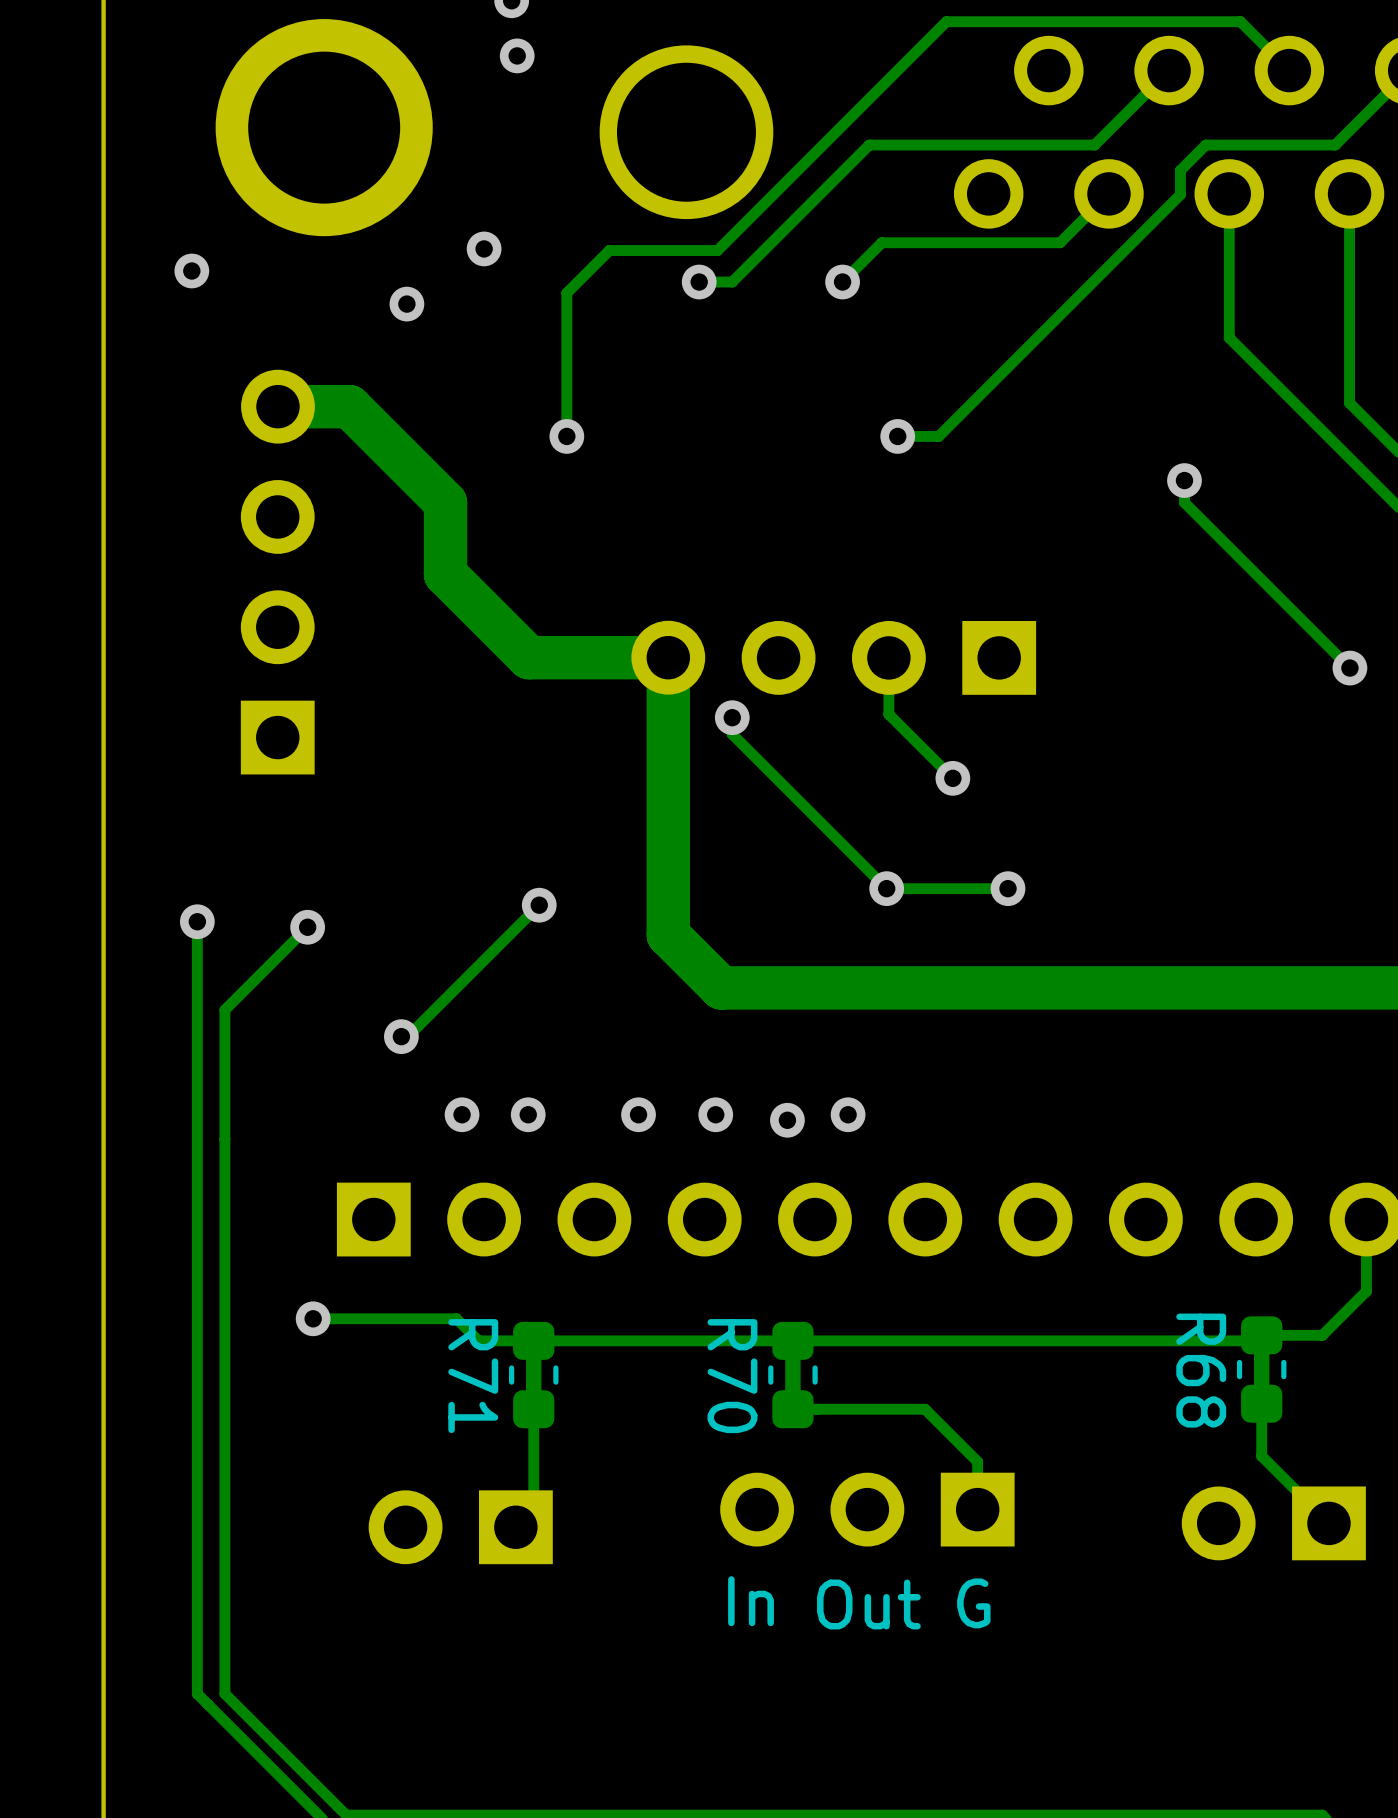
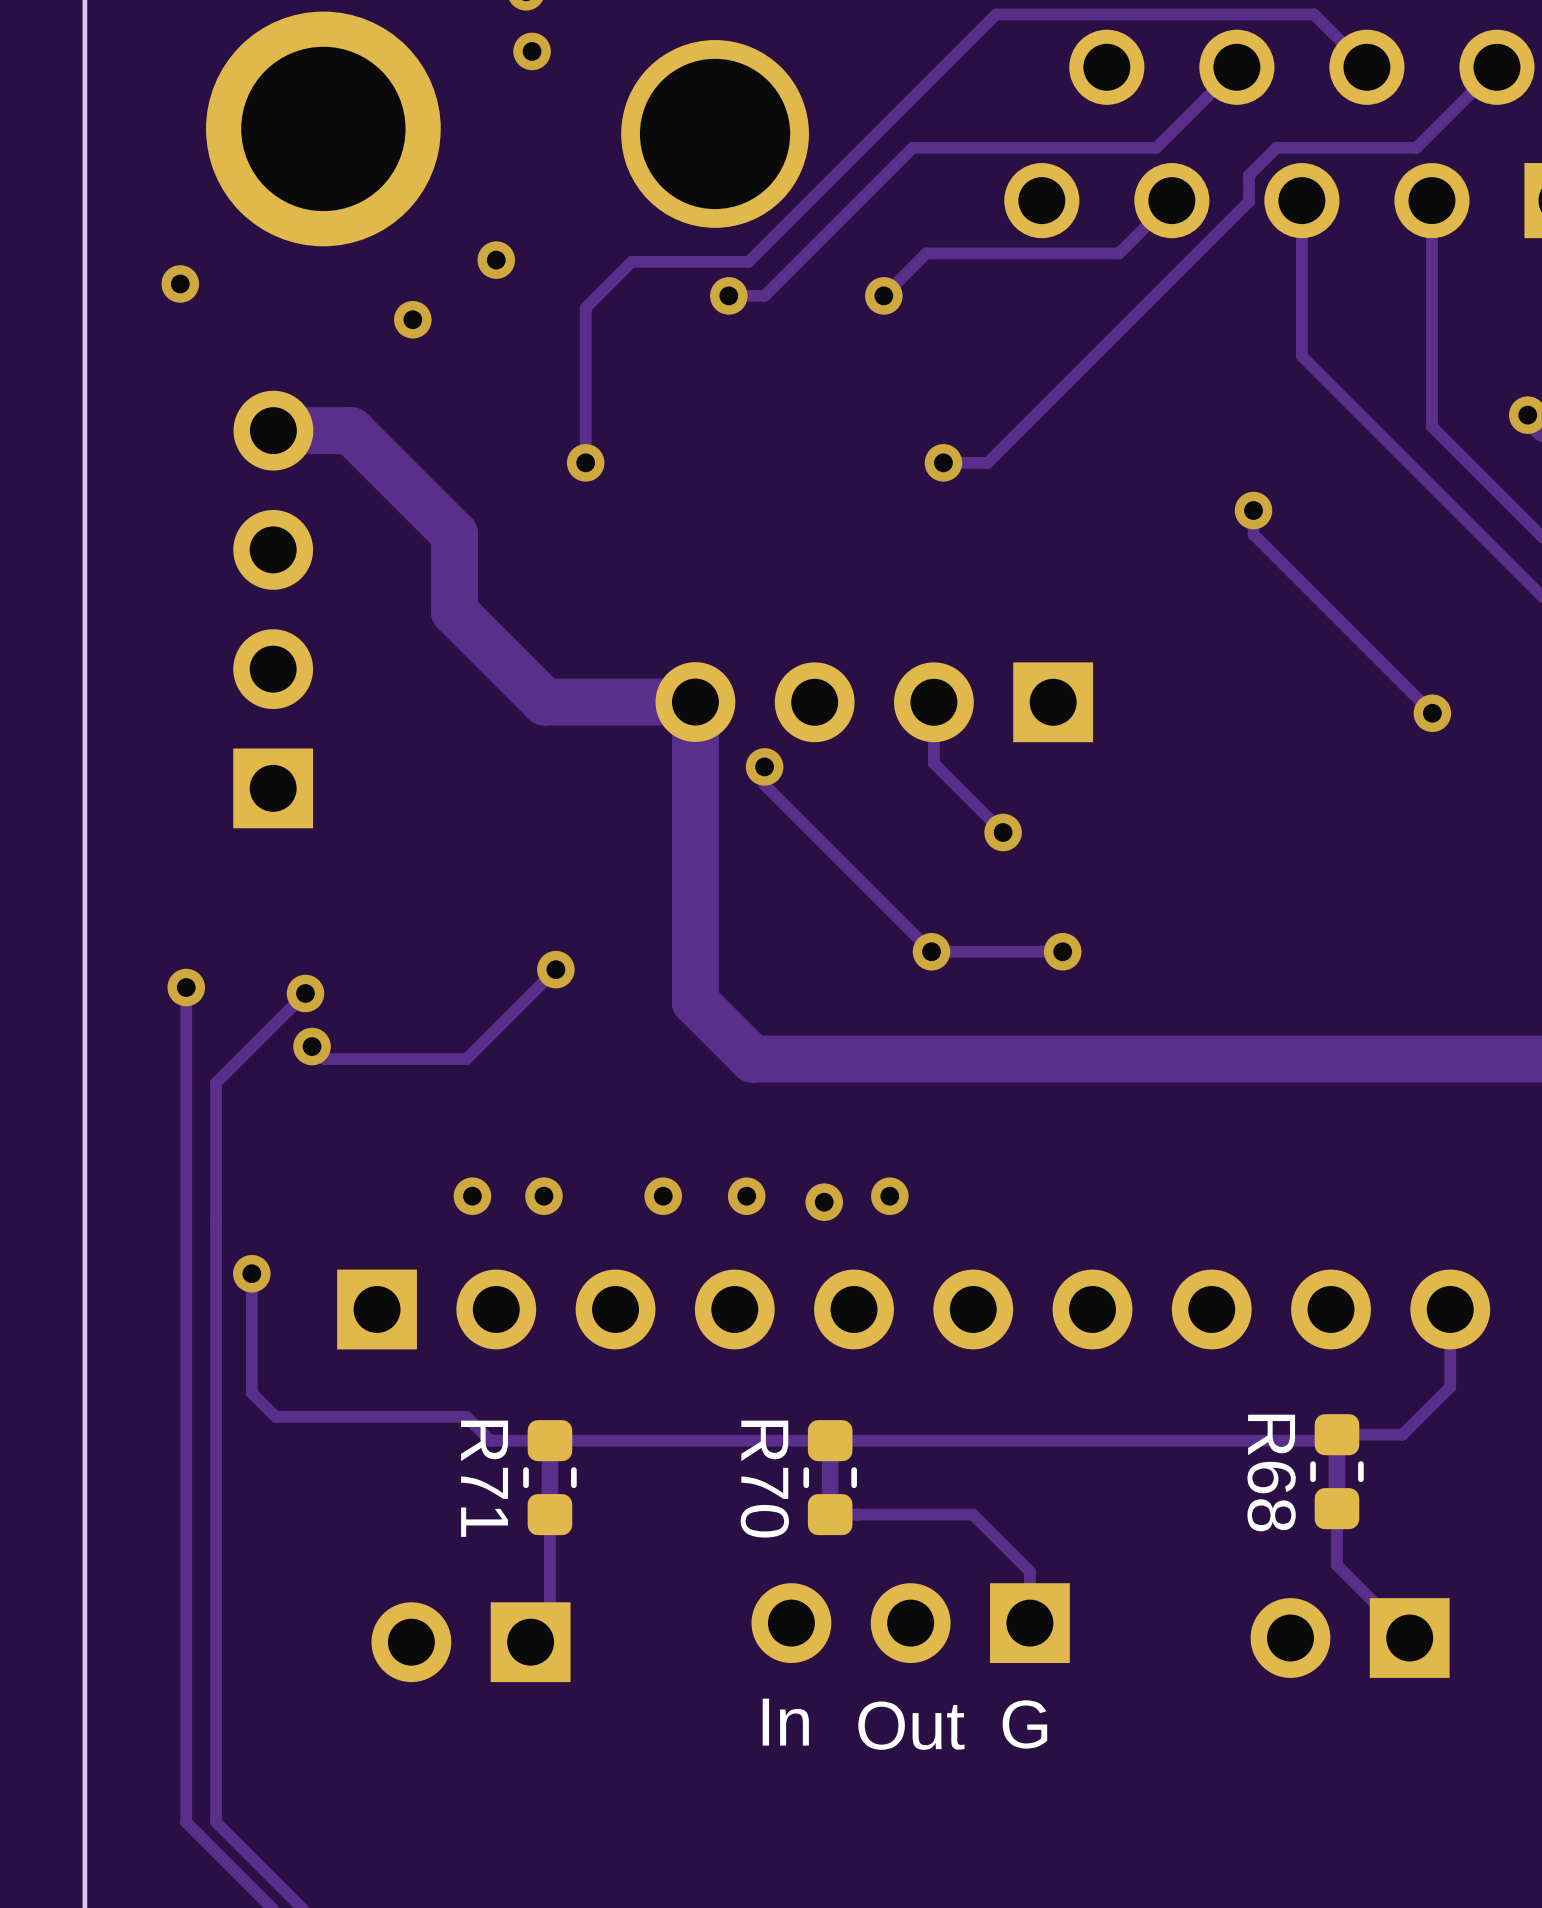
via: none -> (312, 1046)
track: (456, 987) (407, 1036) (401, 1036) -> (466, 1059) (324, 1059) (312, 1046)
via: (401, 1036) -> none
track: none -> (251, 1273) (251, 1392) (275, 1416) (311, 1416)
via: none -> (251, 1273)
via: (313, 1318) -> none

